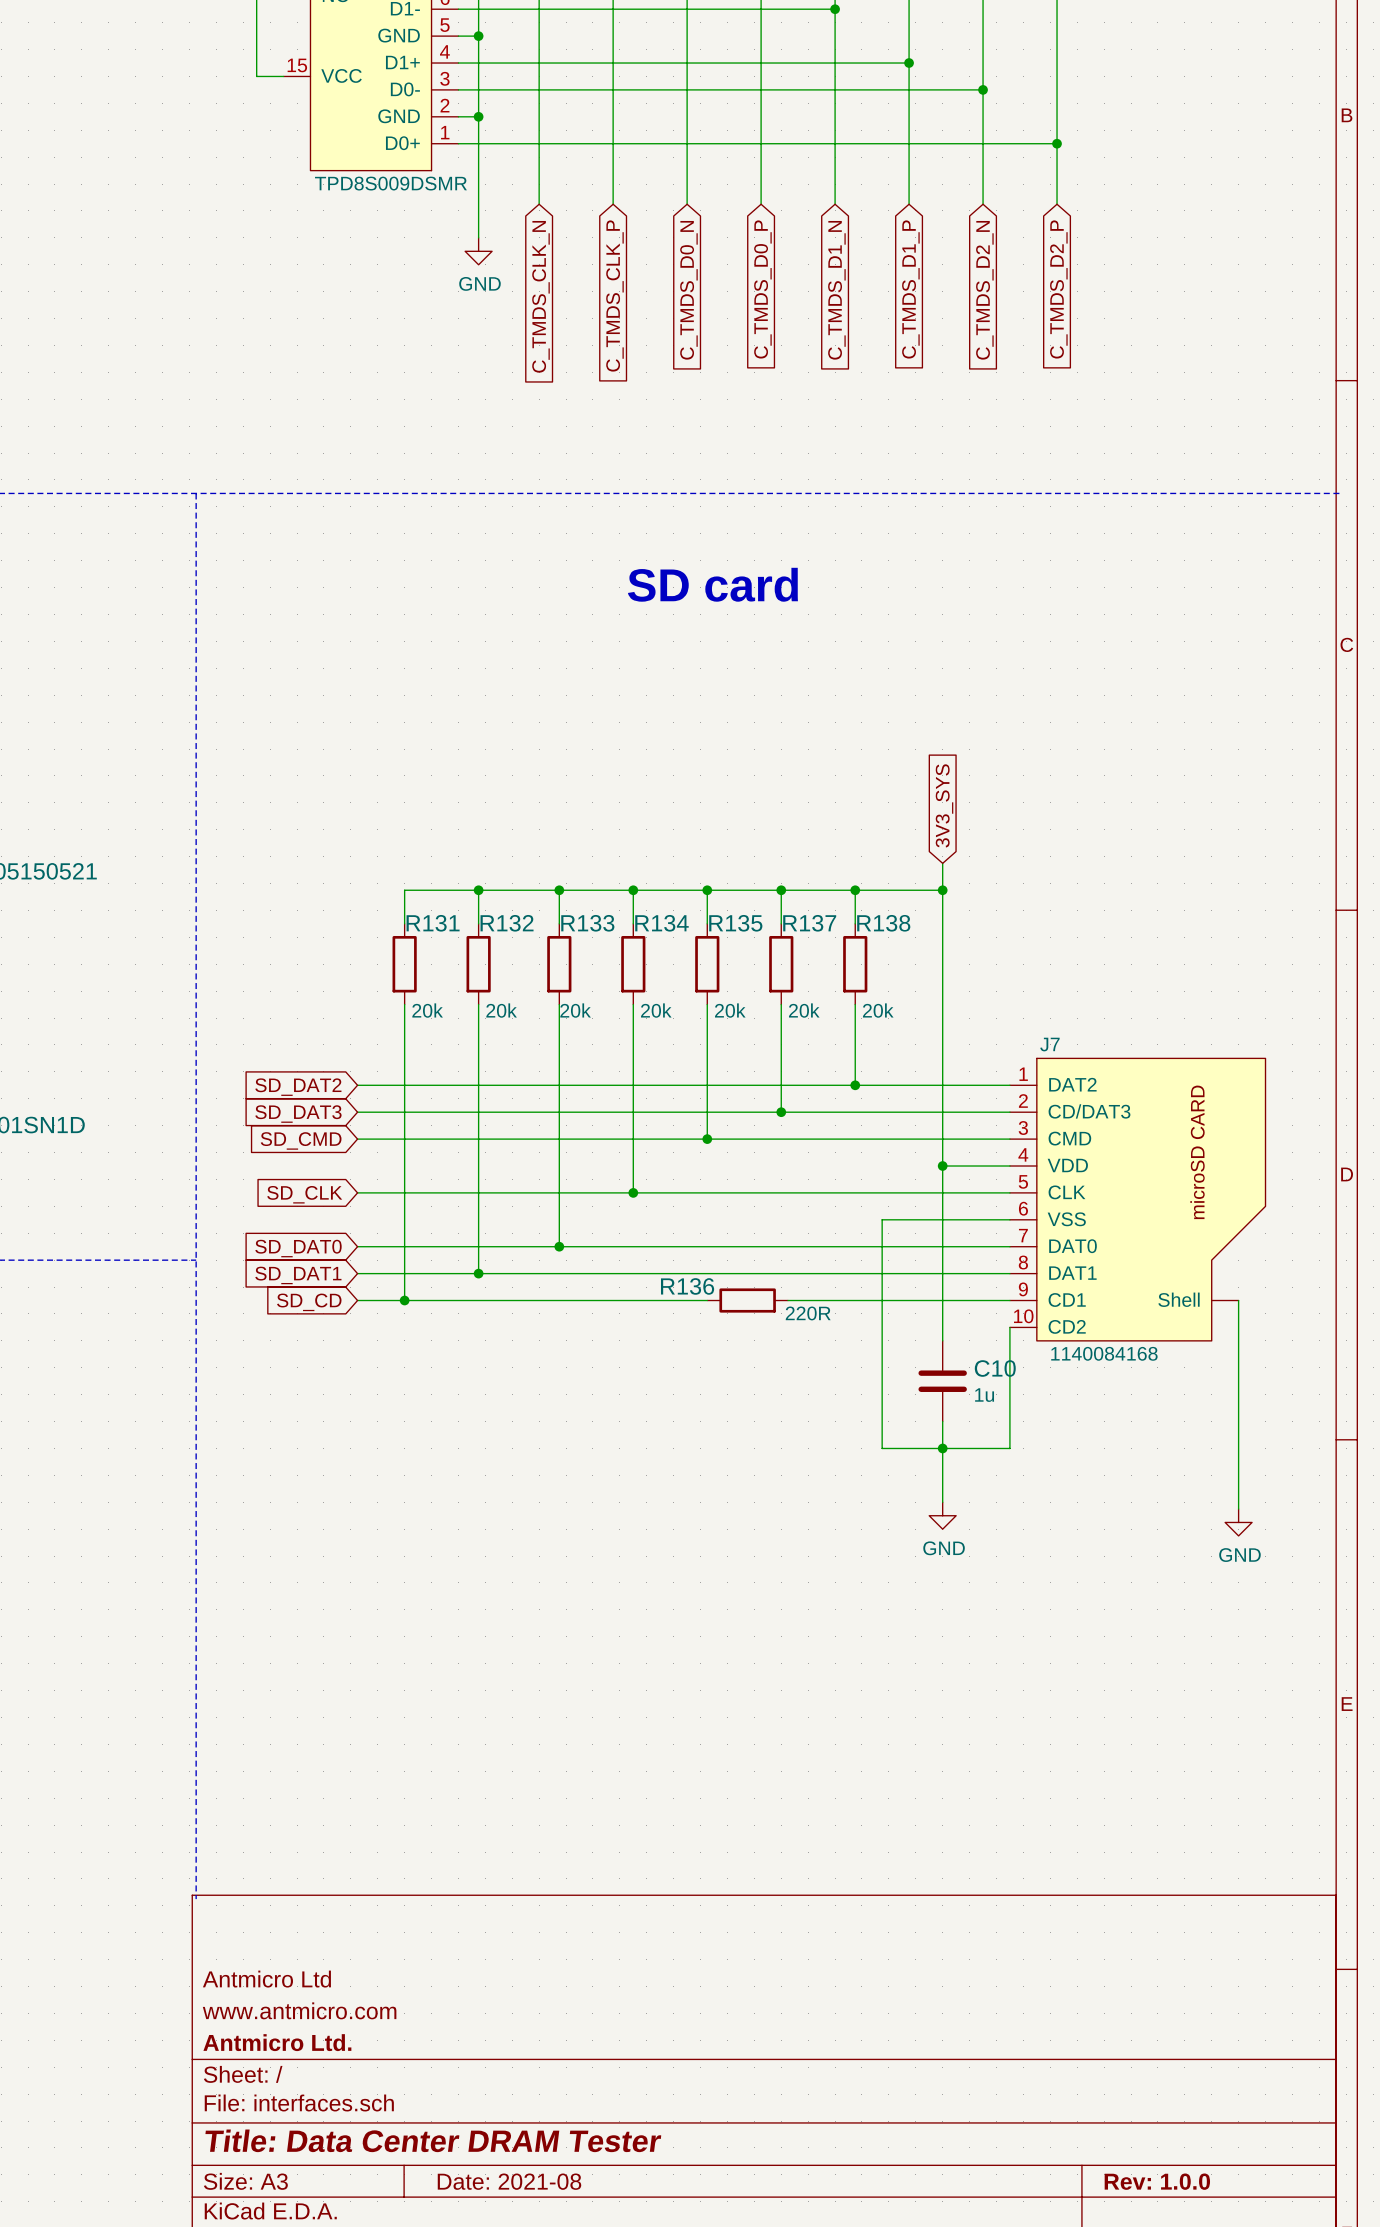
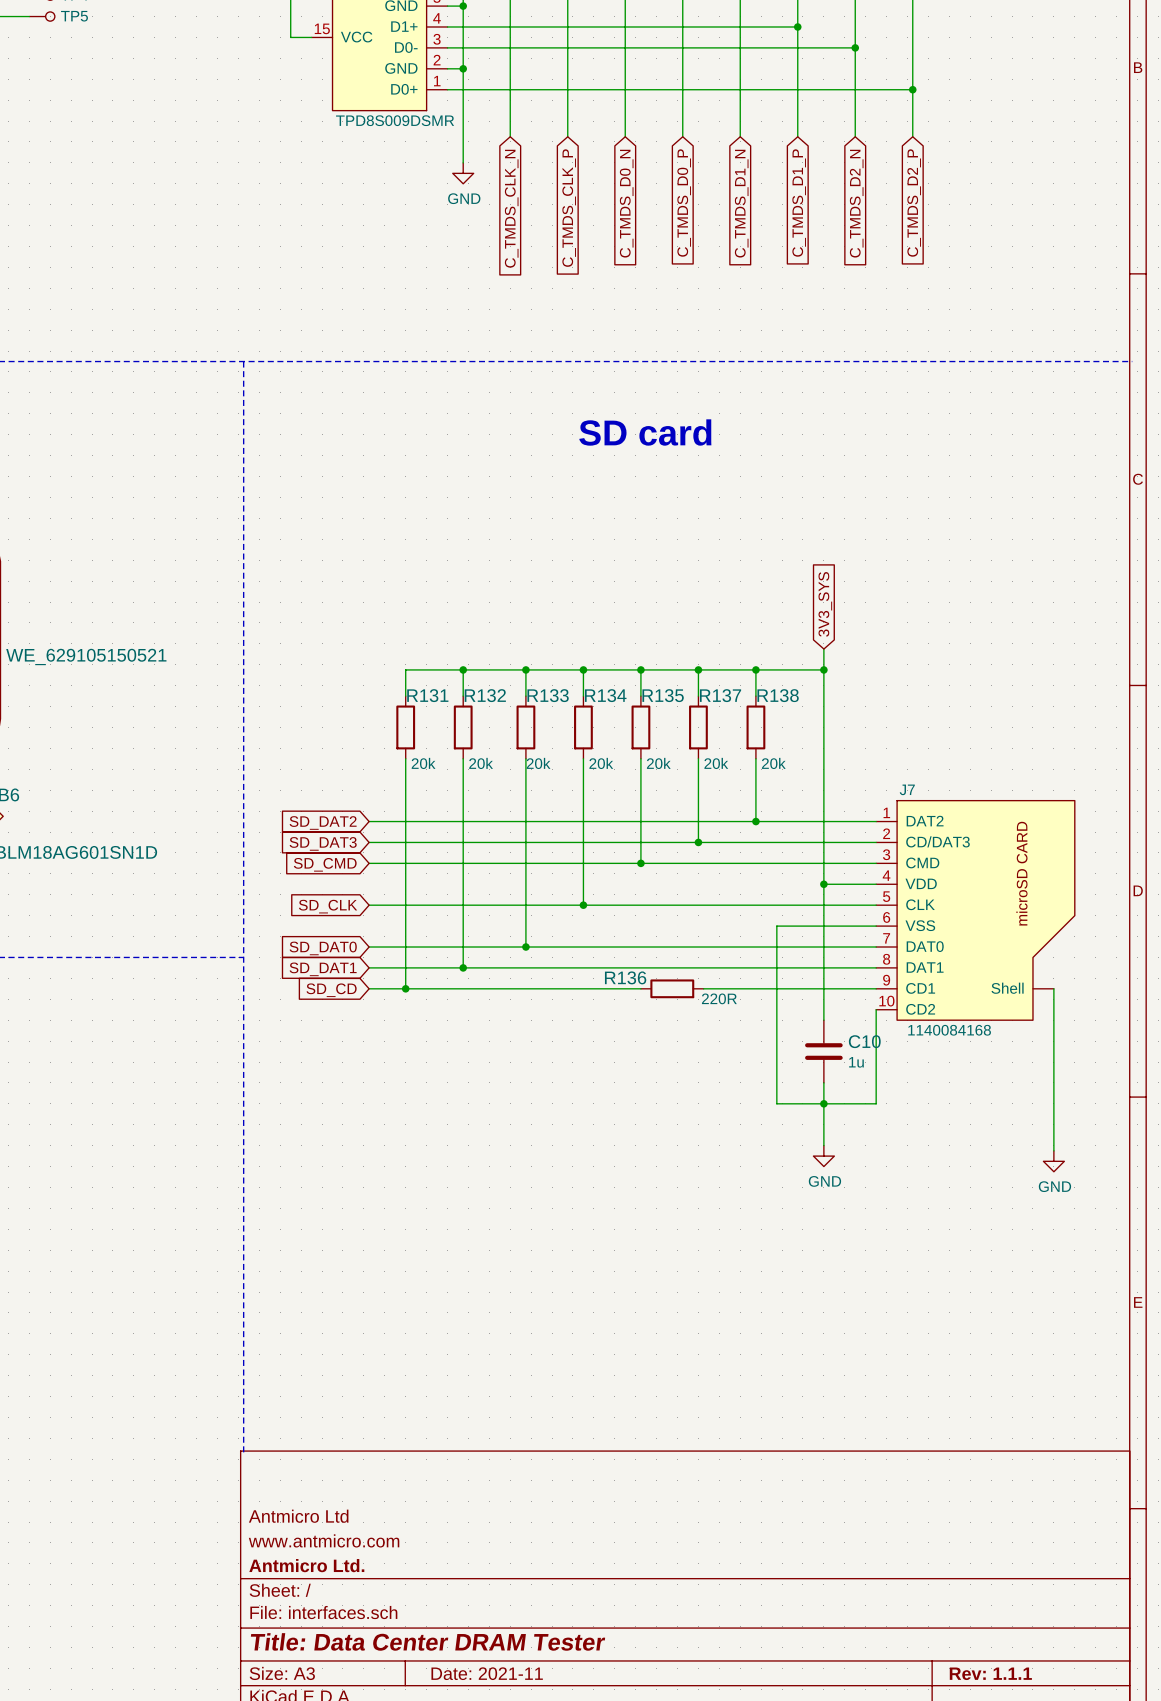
title block: Date: 2021-08 (509, 2181) -> Date: 2021-11 (487, 1673)
title block: Rev: 1.0.0 (1157, 2181) -> Rev: 1.1.1 (990, 1673)

